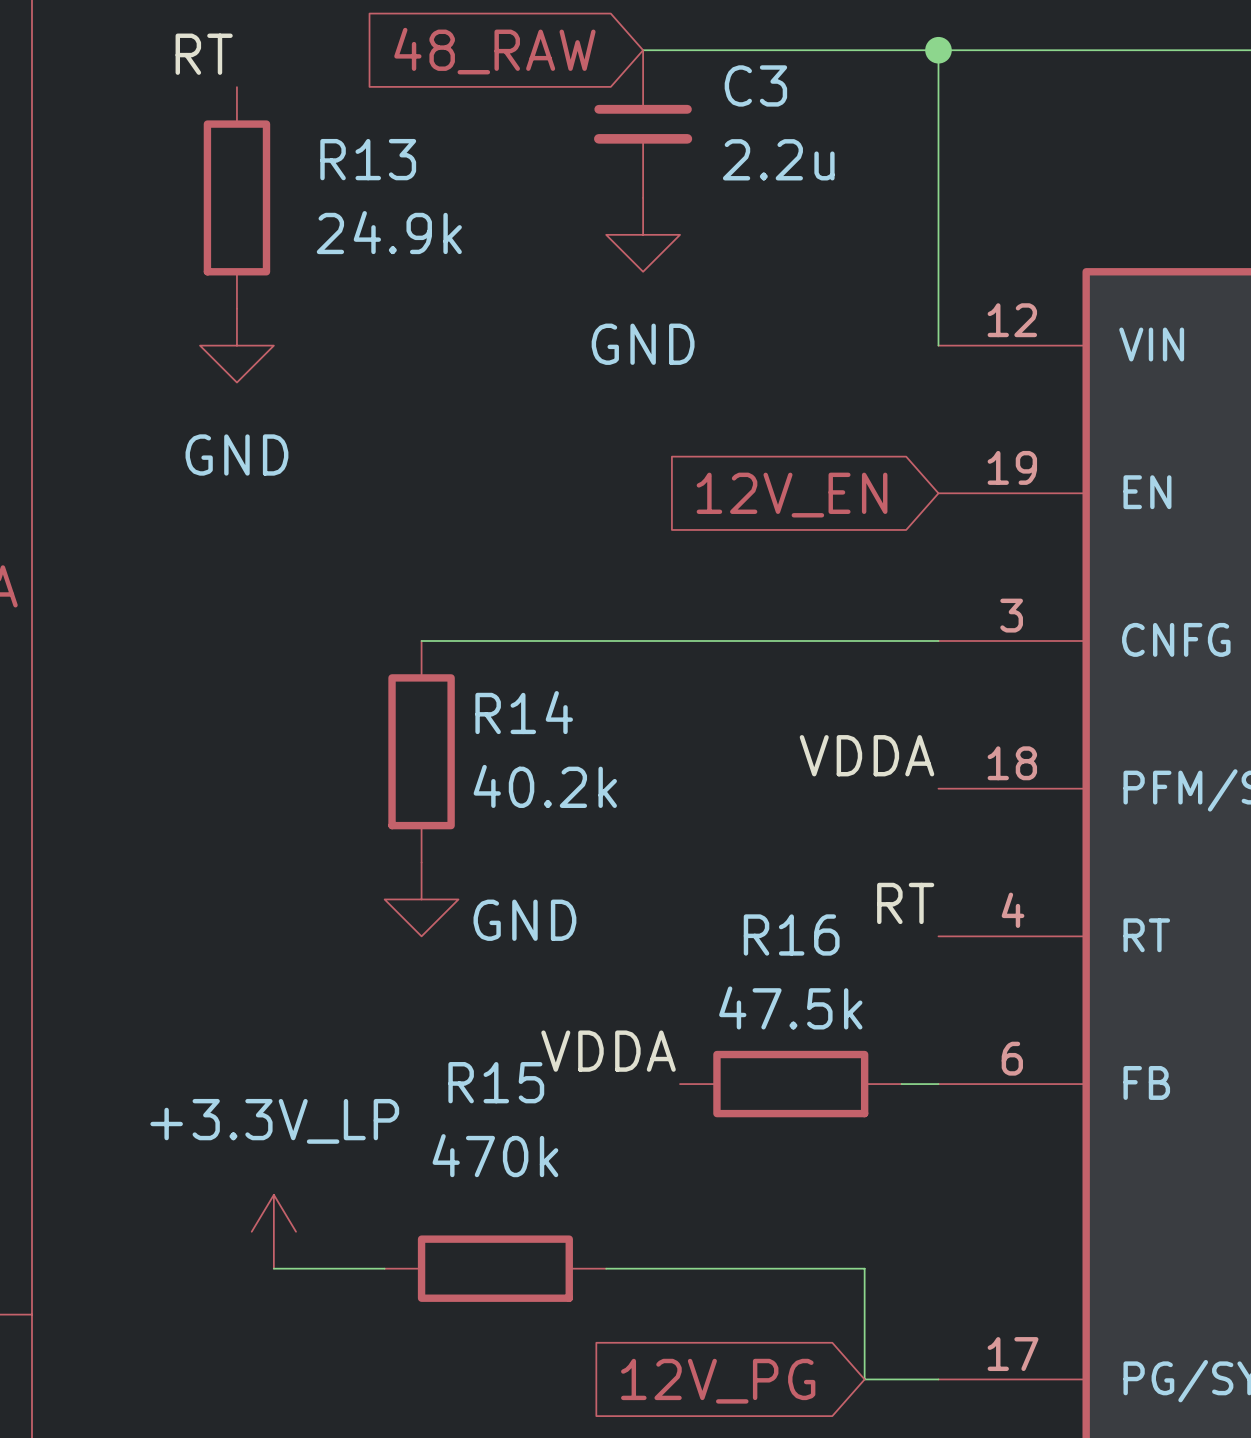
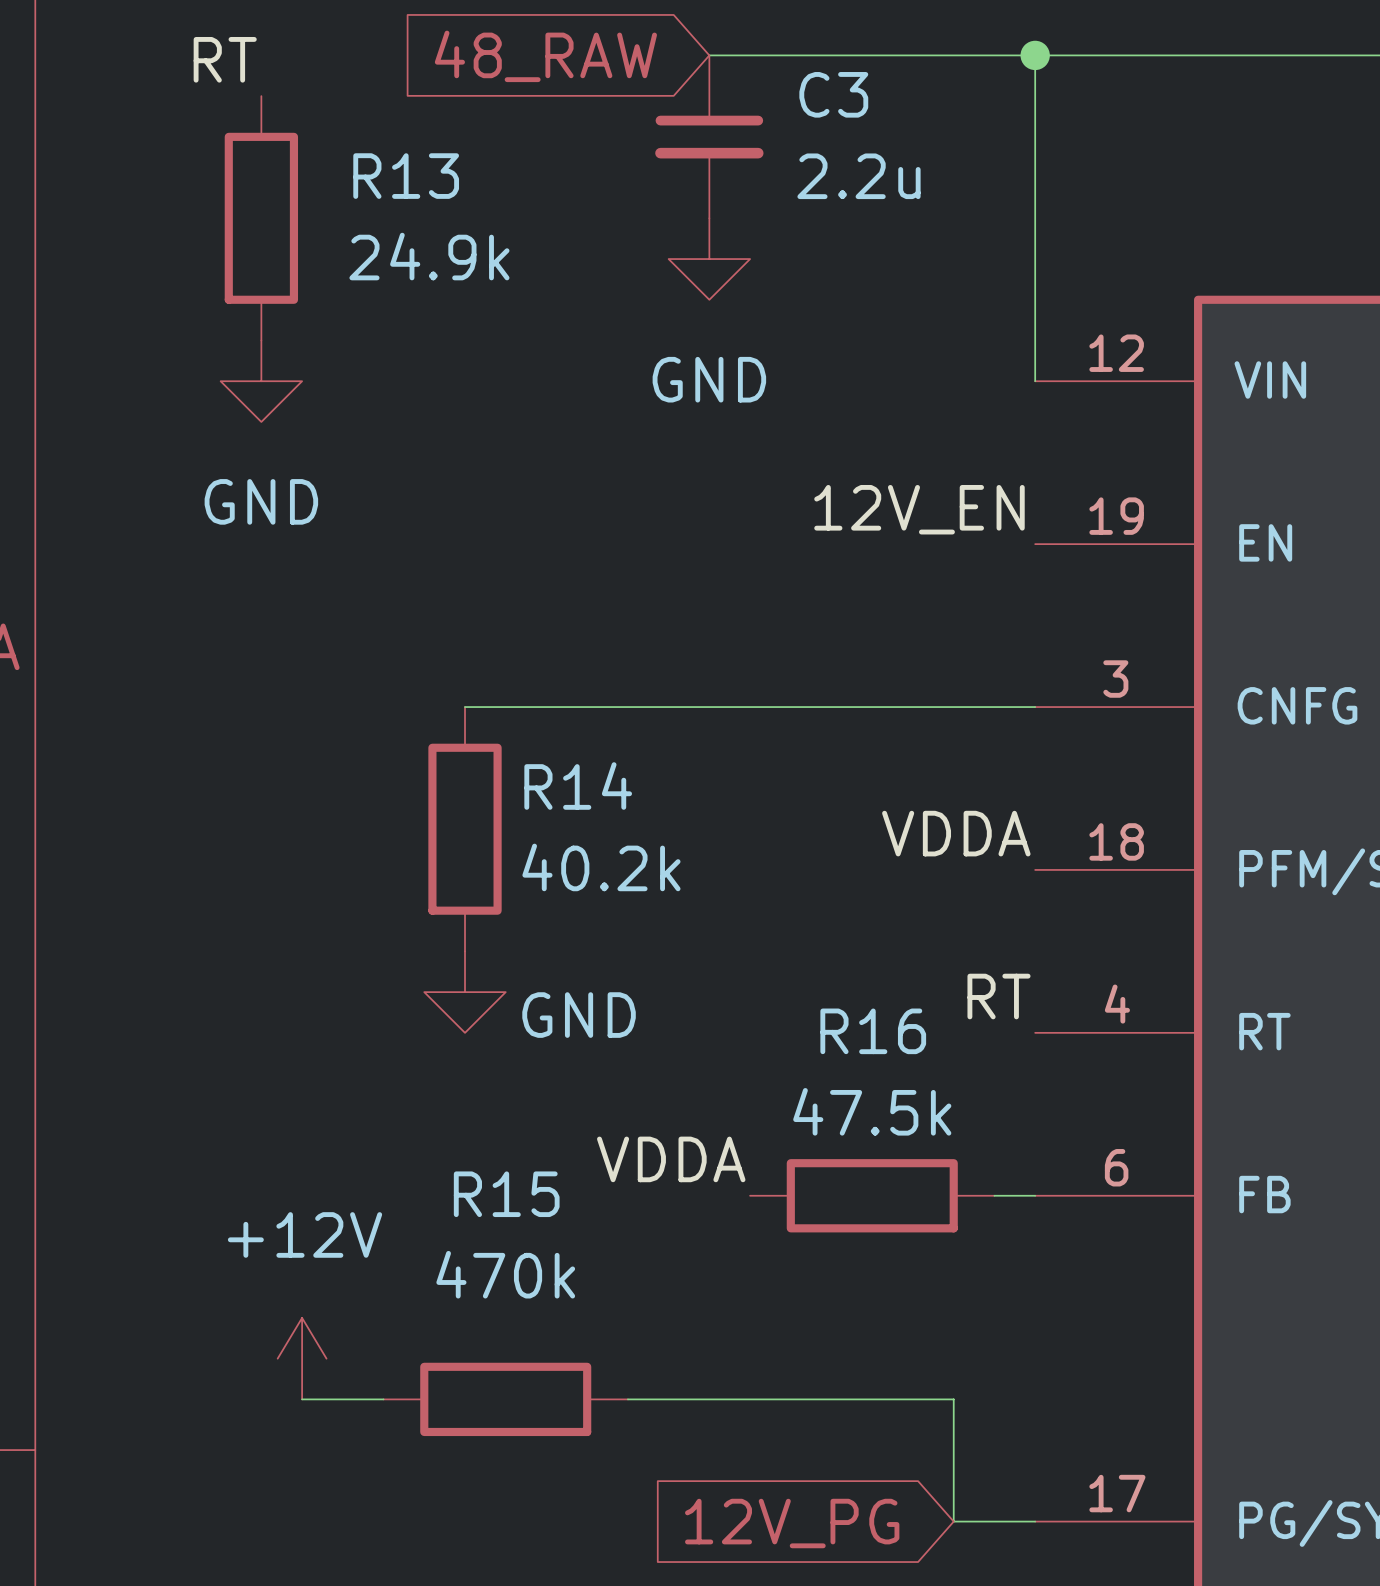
label: none -> 12V_EN (919, 509)
global label: 12V_EN (792, 495) -> none
power symbol: +3.3V_LP (273, 1231) -> +12V (302, 1358)
R15 position: (495, 1268) -> (505, 1399)

